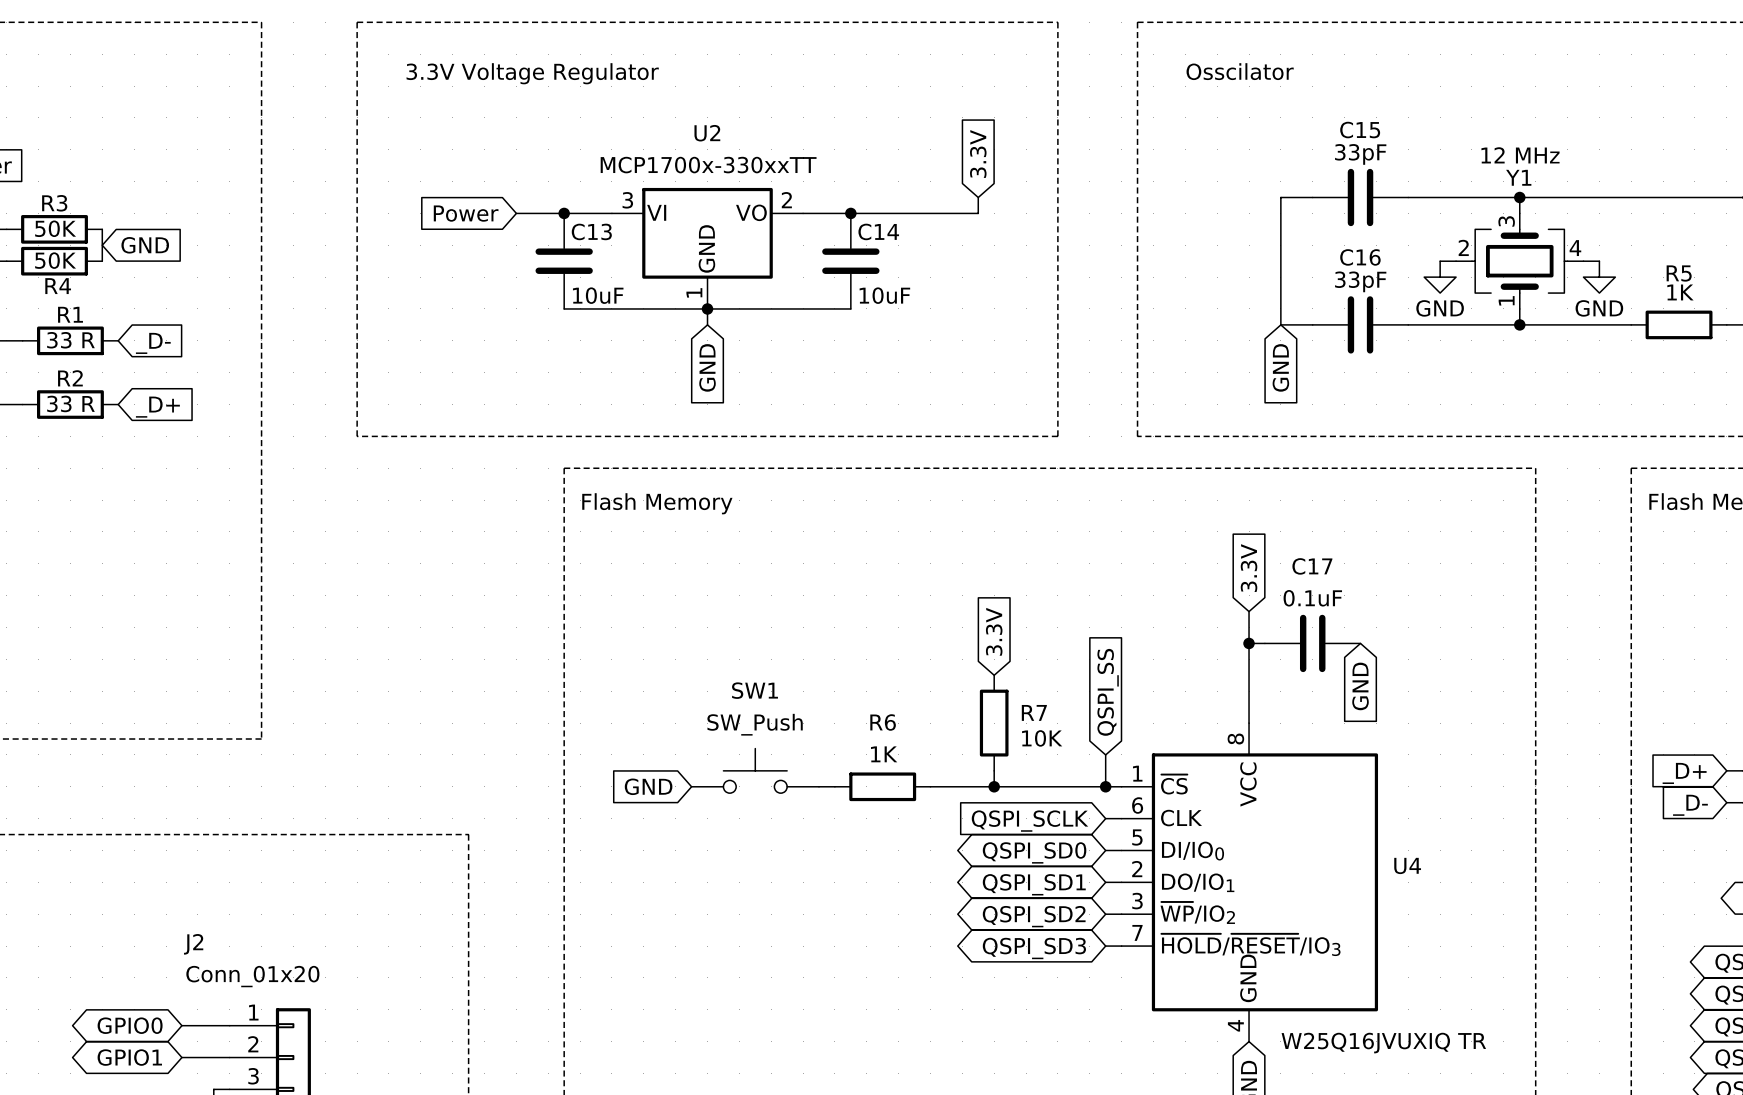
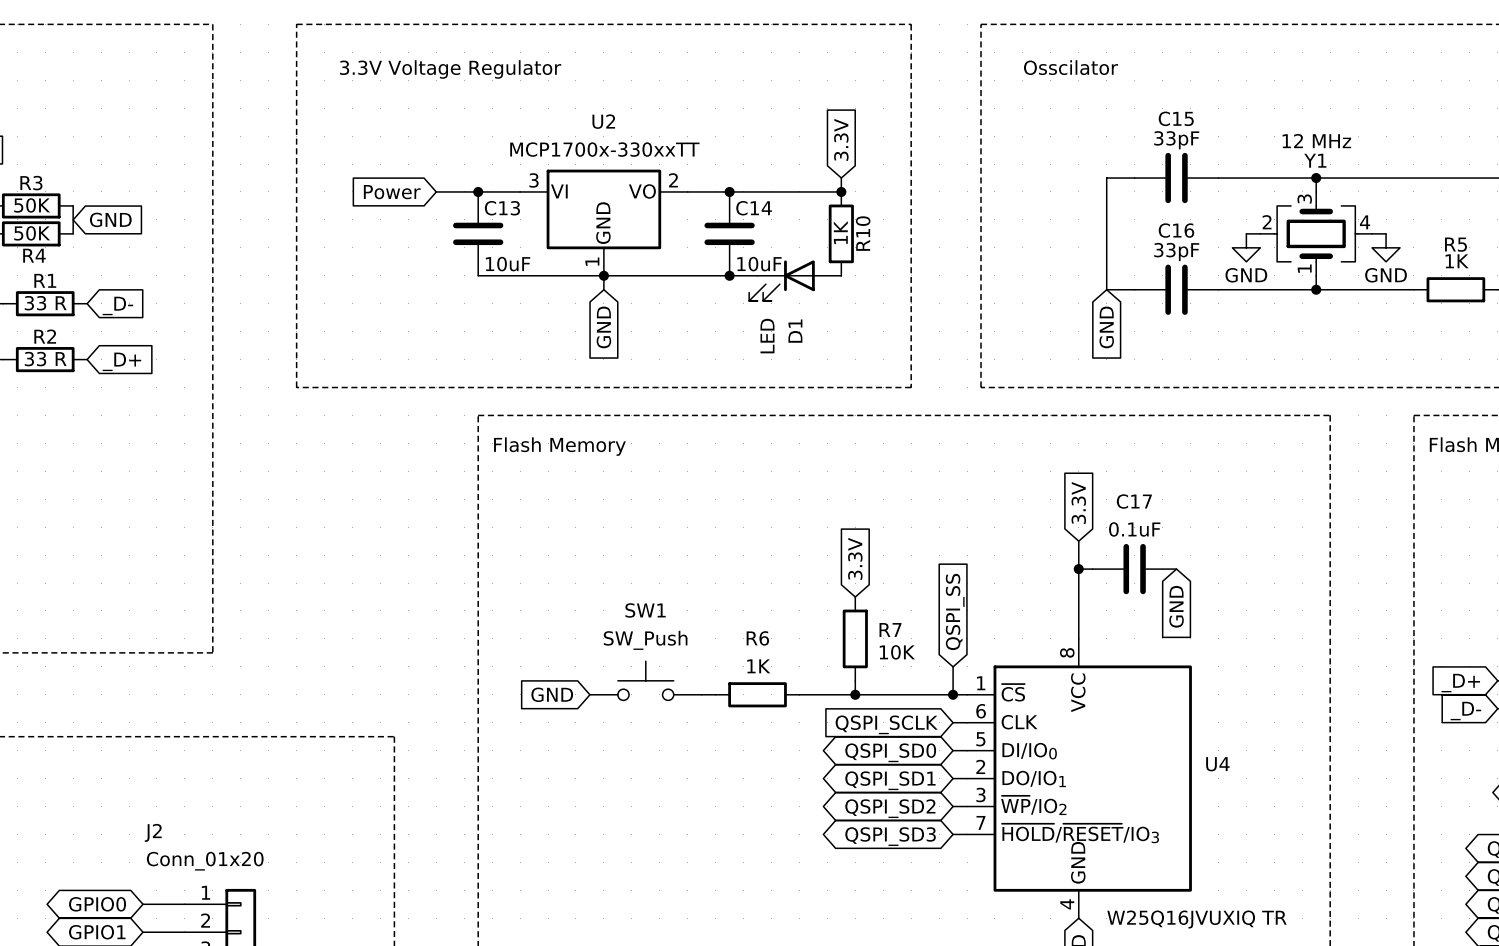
junction: none -> (841, 191)
R10: none -> 1K (841, 233)
wire: none -> (729, 275) (757, 275)
junction: none -> (729, 275)
D1: none -> LED (795, 280)

